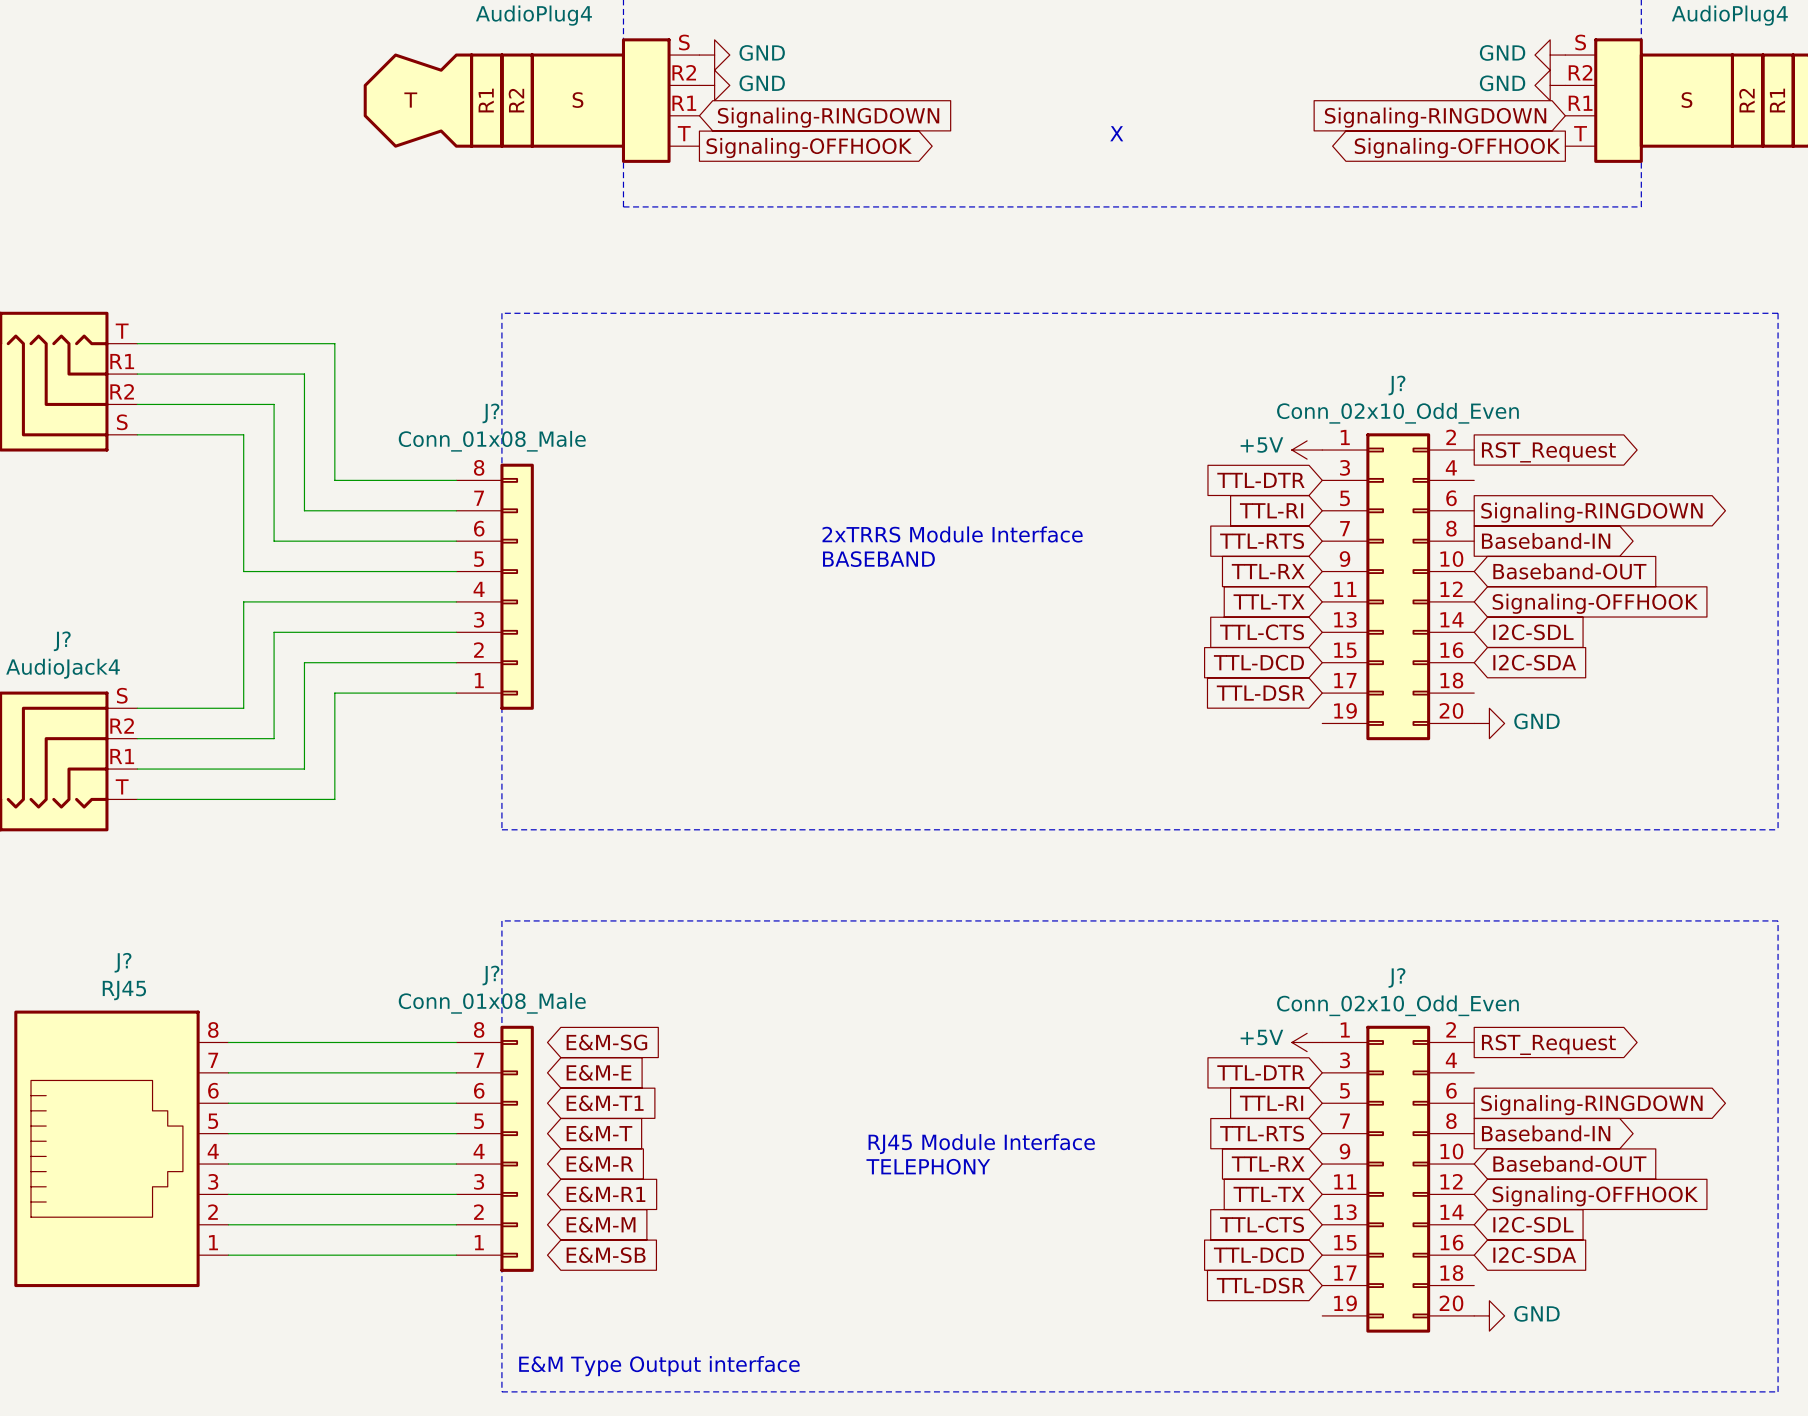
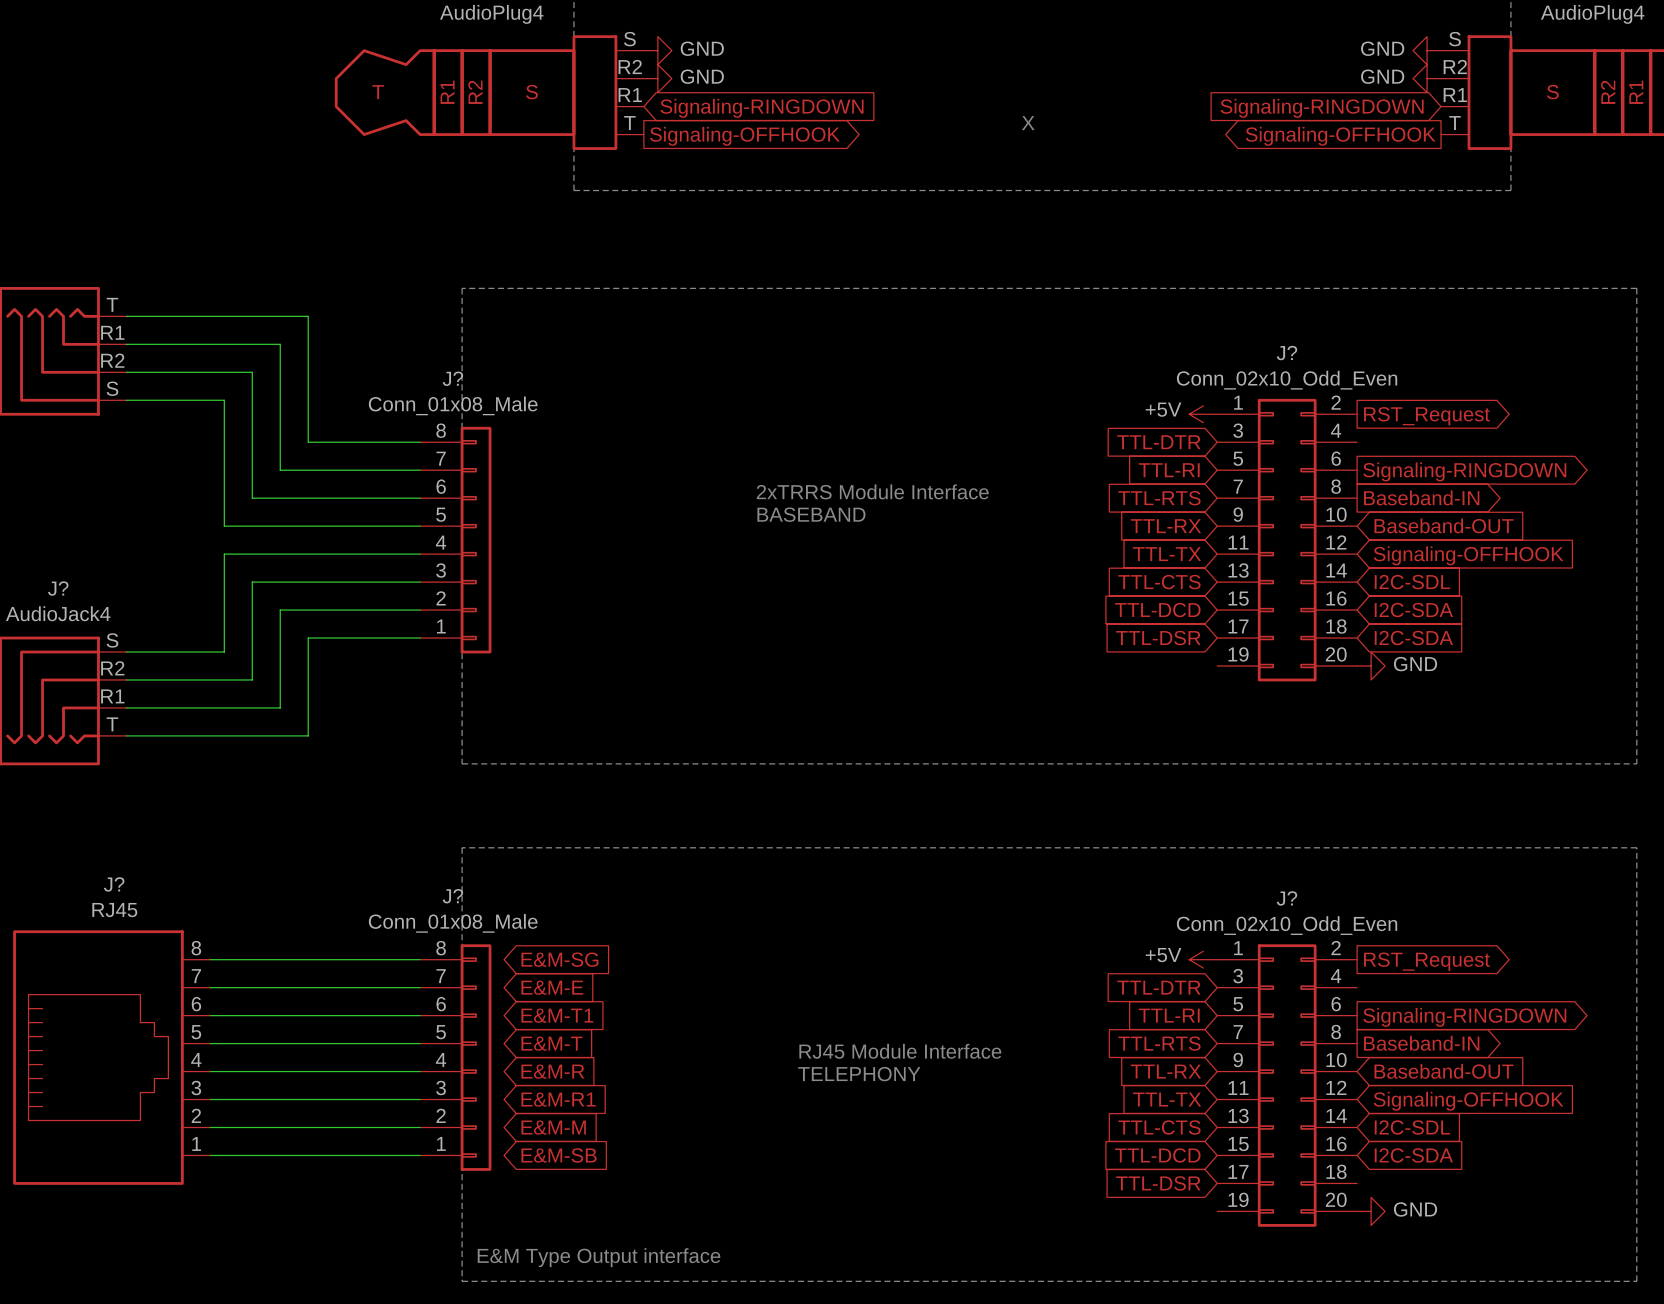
global label: none -> I2C-SDA (1413, 638)

